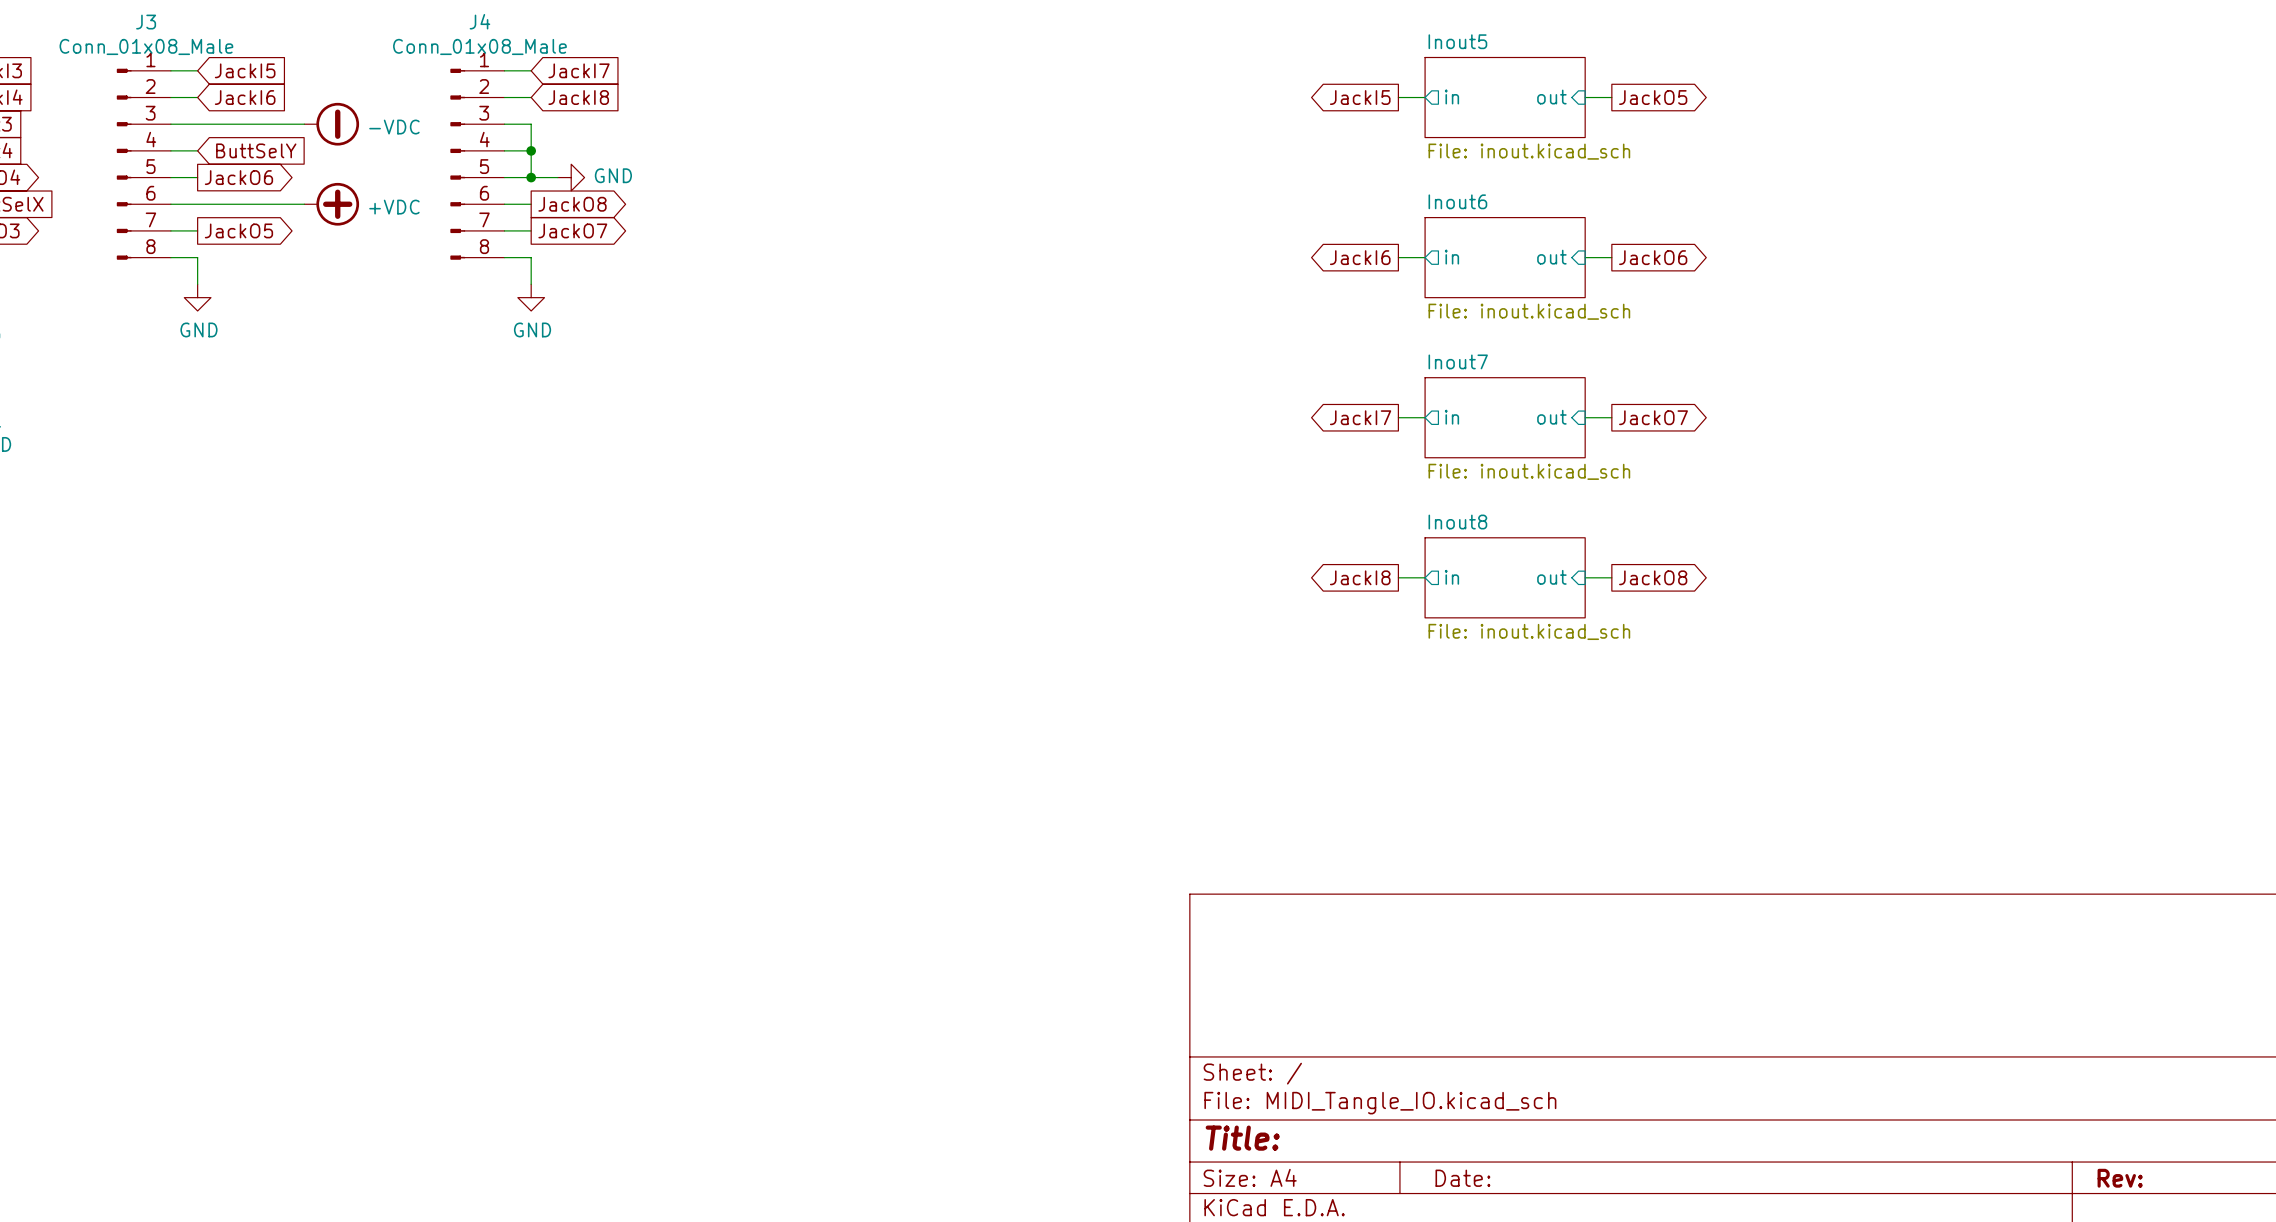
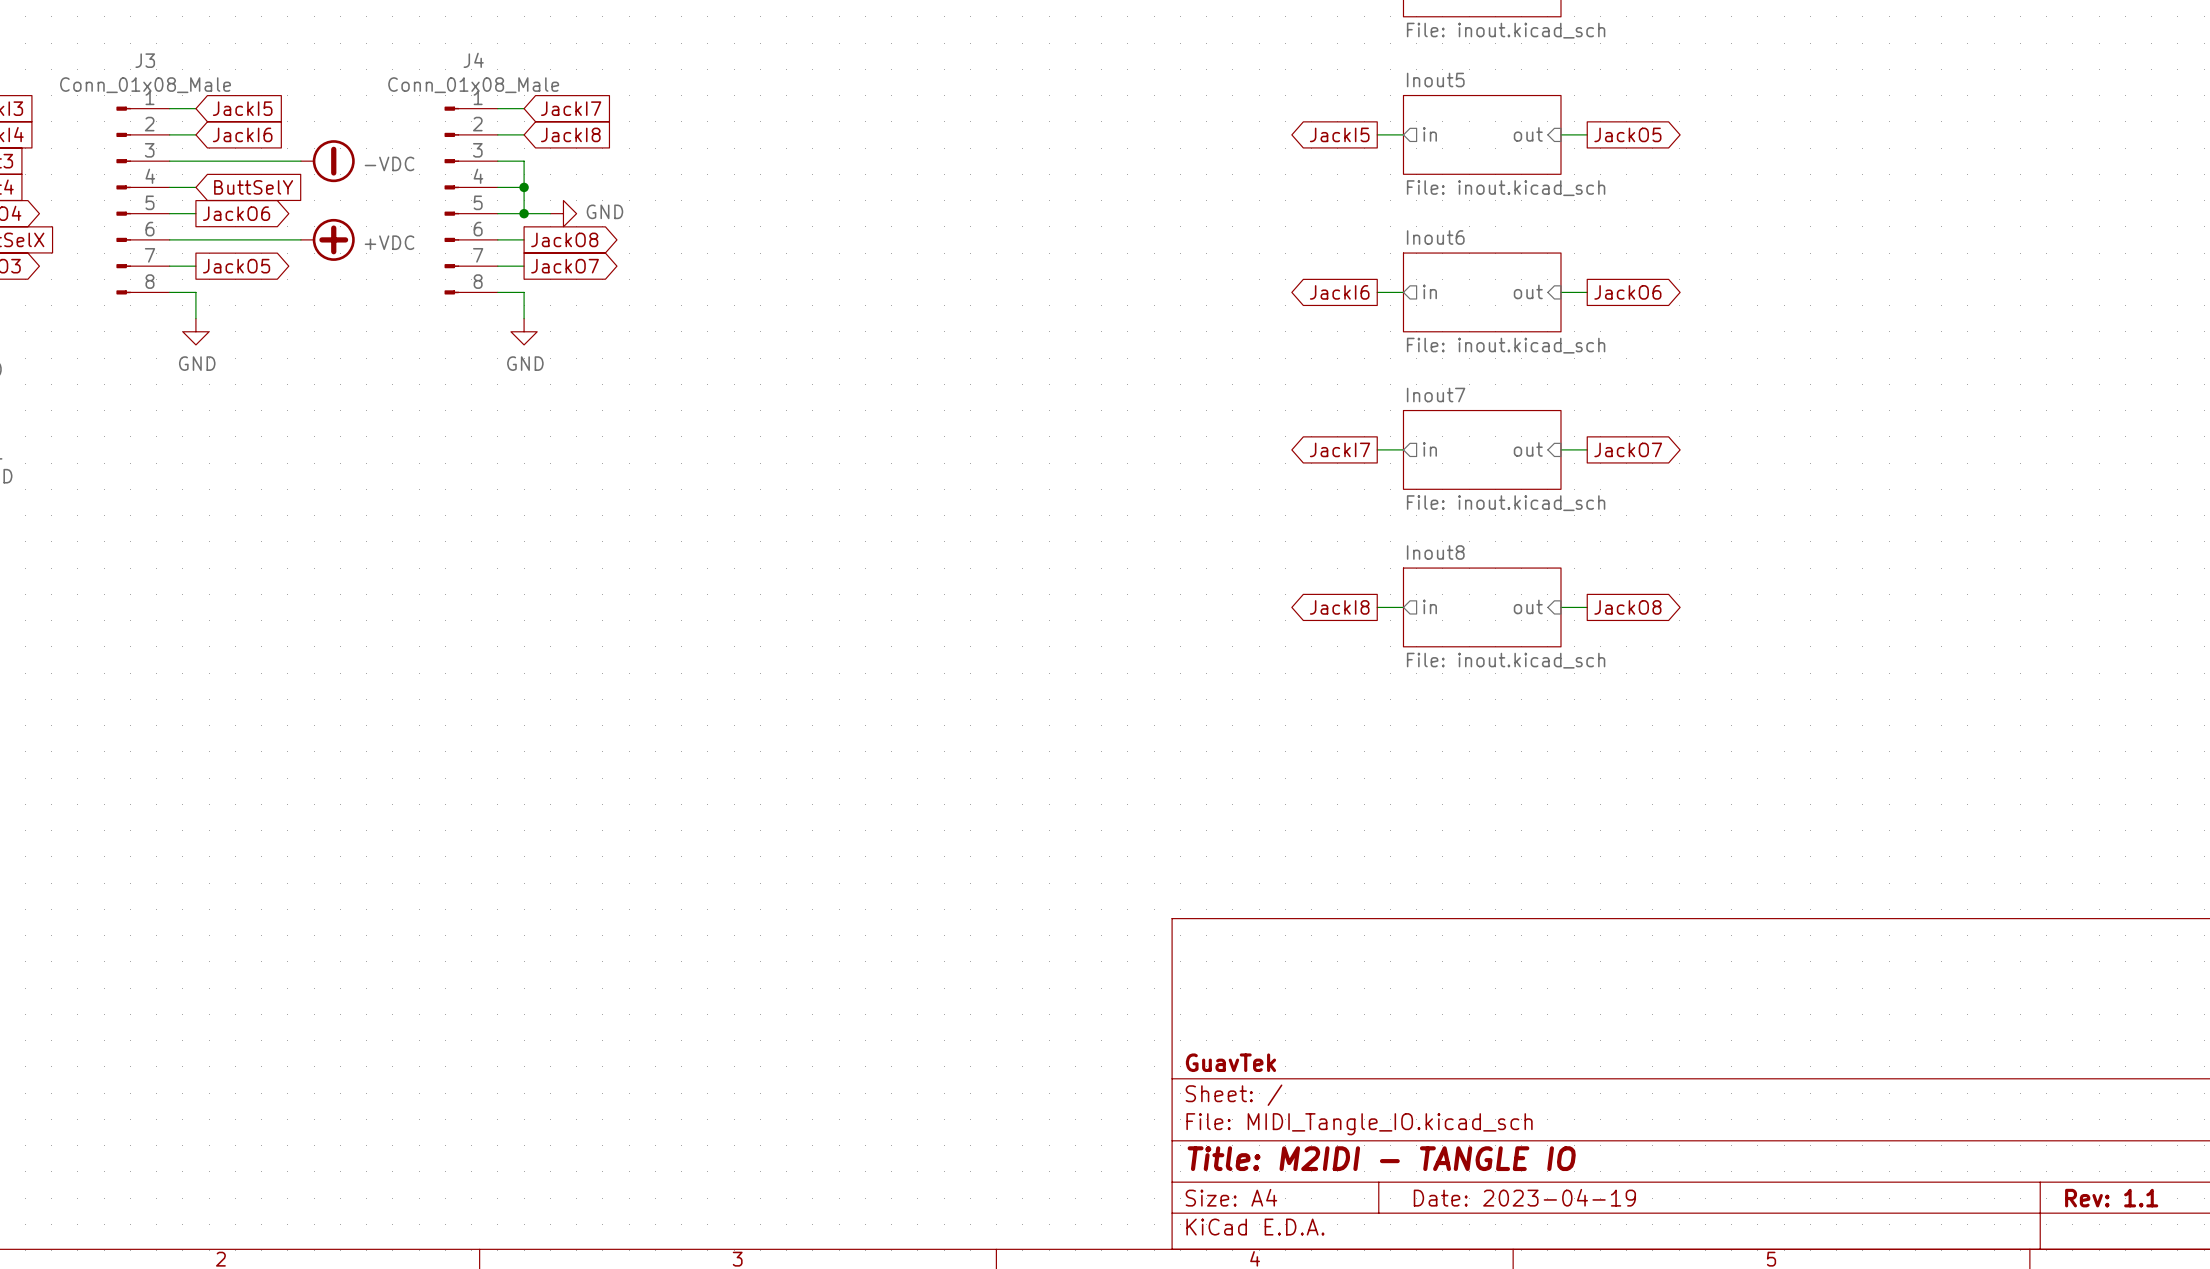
title block: none -> GuavTek (1230, 1062)
title block: Title: (1242, 1138) -> Title: M2IDI - TANGLE IO (1381, 1158)
title block: Date: (1462, 1178) -> Date: 2023-04-19 (1524, 1197)
title block: Rev: (2120, 1178) -> Rev: 1.1 (2111, 1198)

